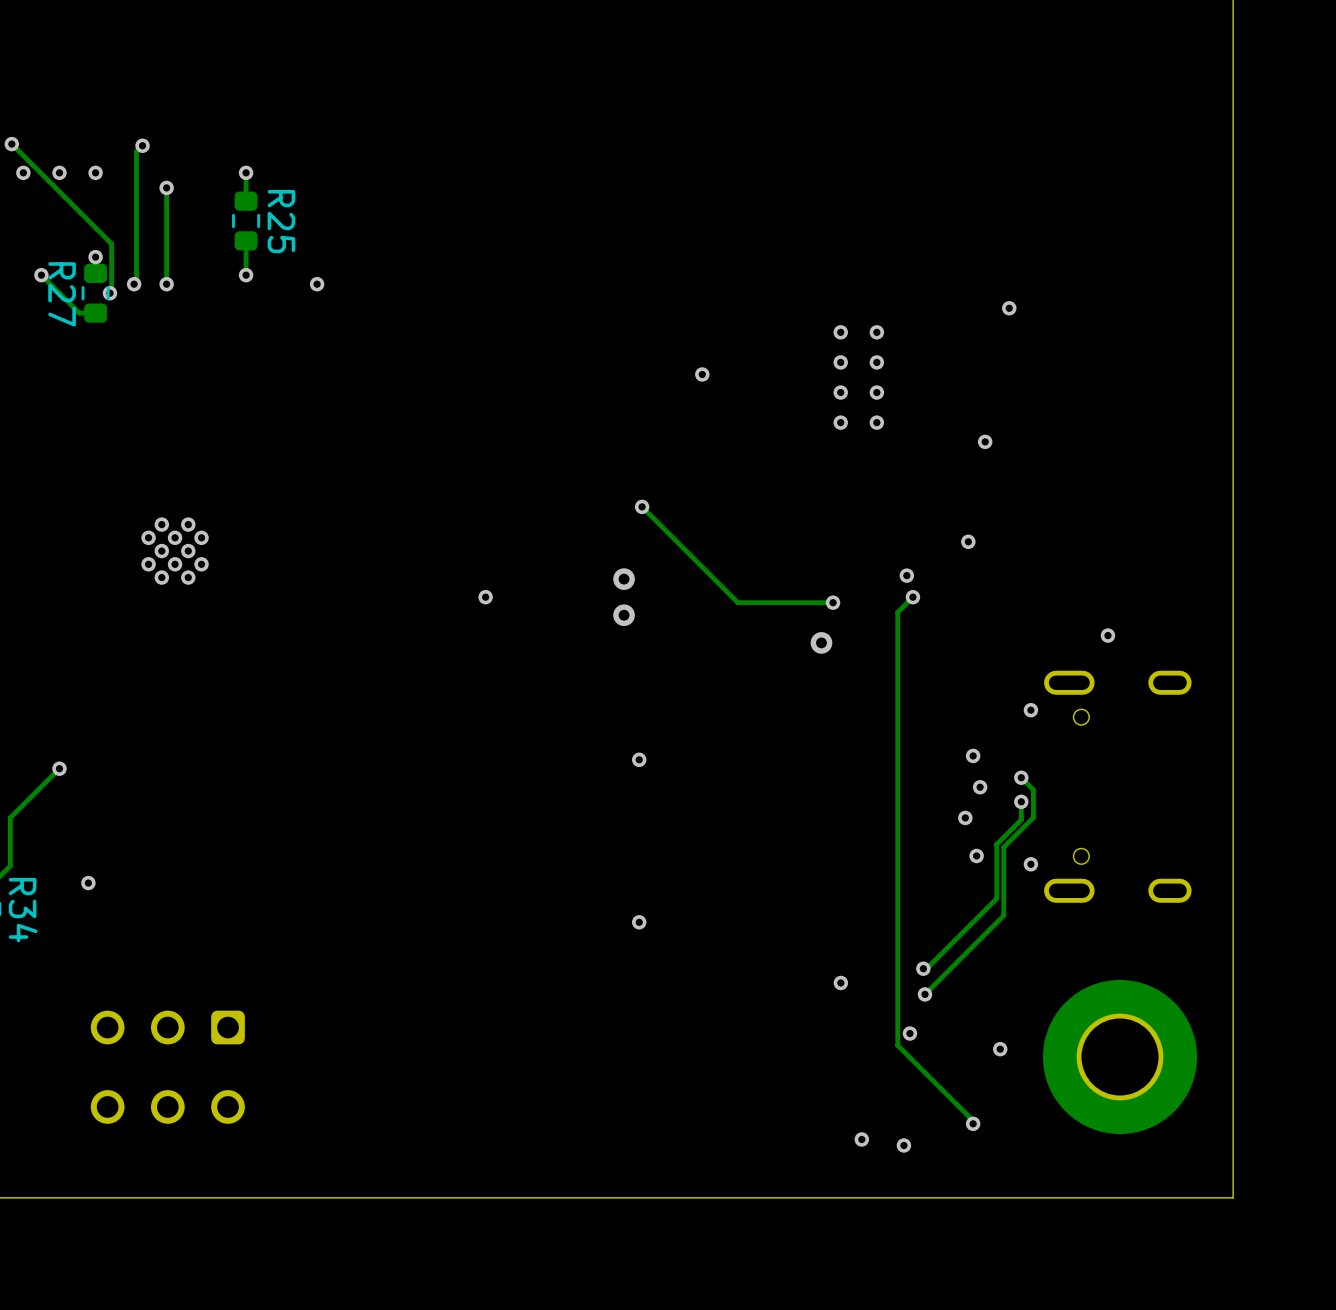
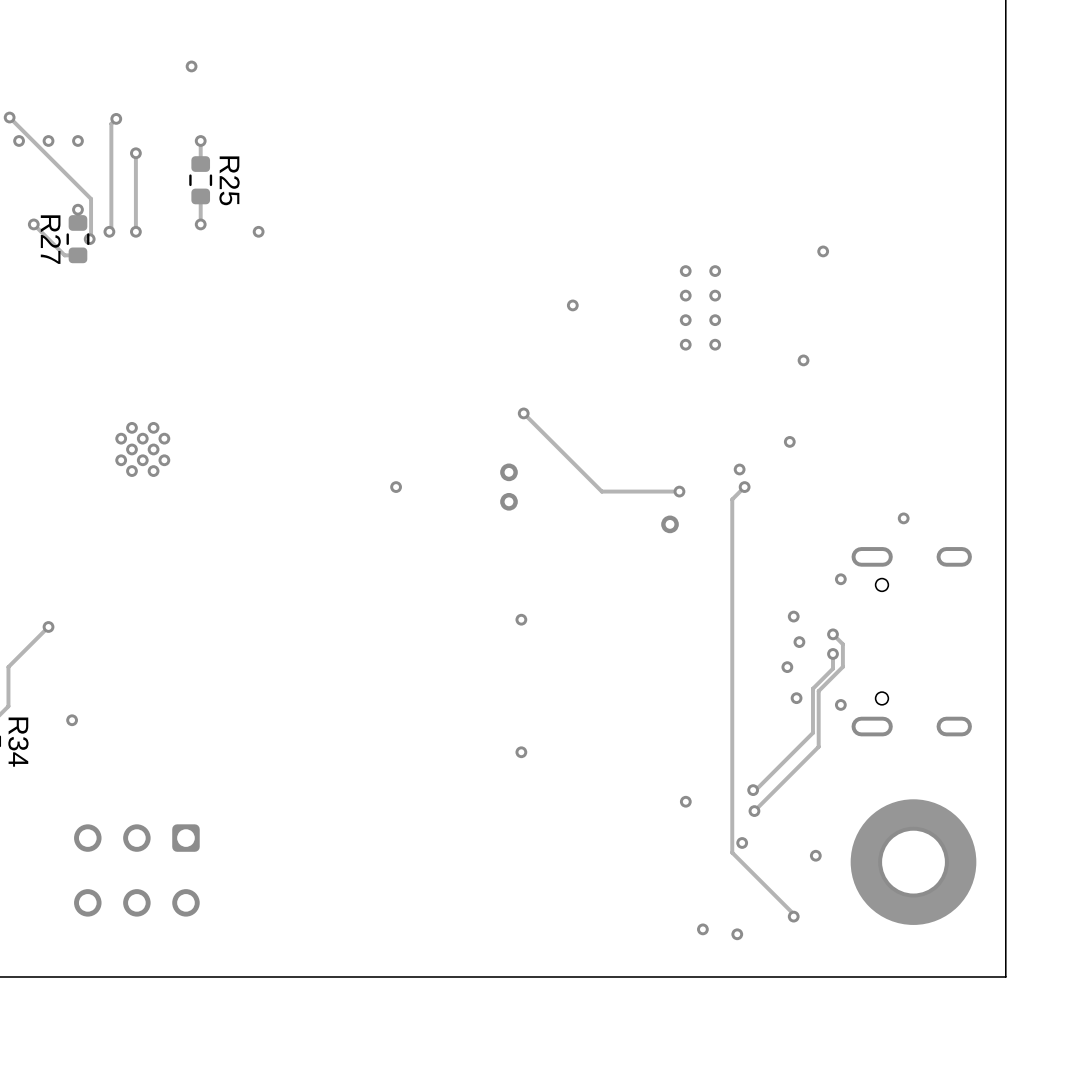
via: none -> (191, 66)

